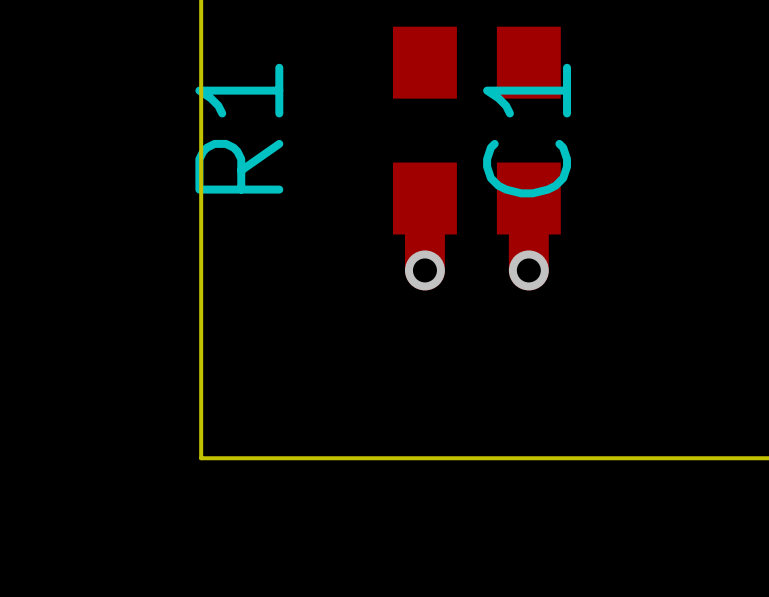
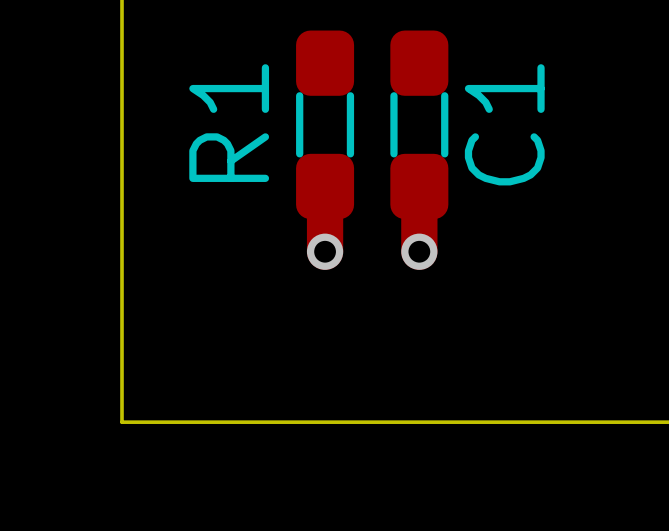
R1 footprint: [392, 26, 457, 235] -> [296, 30, 355, 220]
C1 footprint: [496, 26, 561, 235] -> [390, 30, 449, 220]

